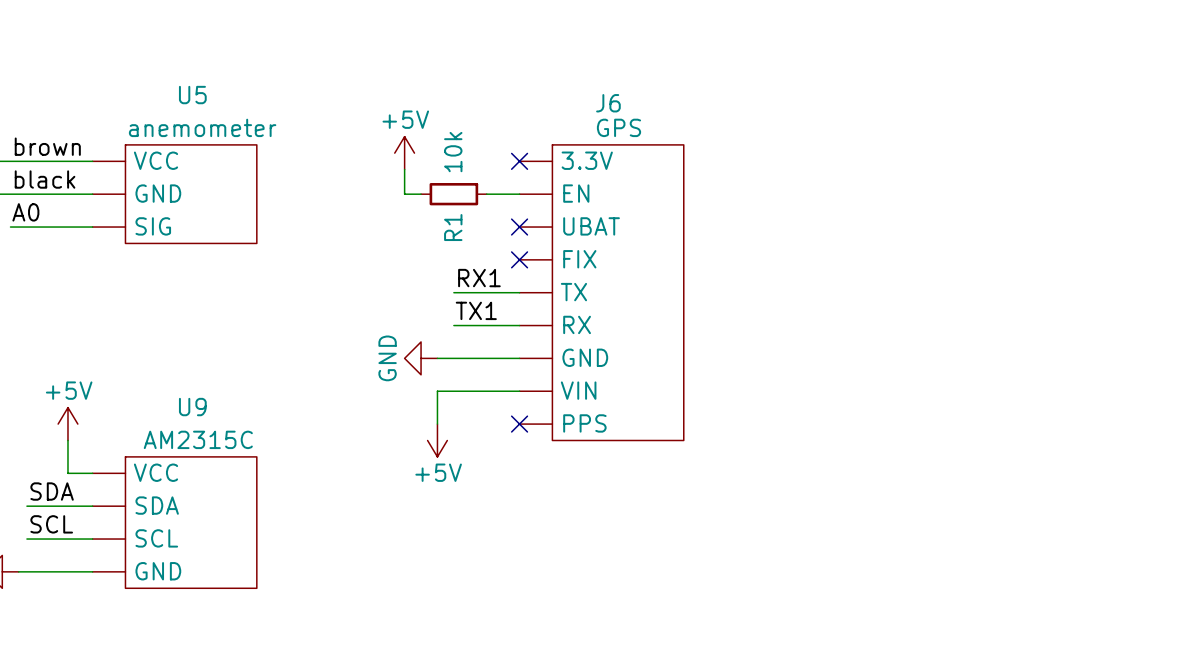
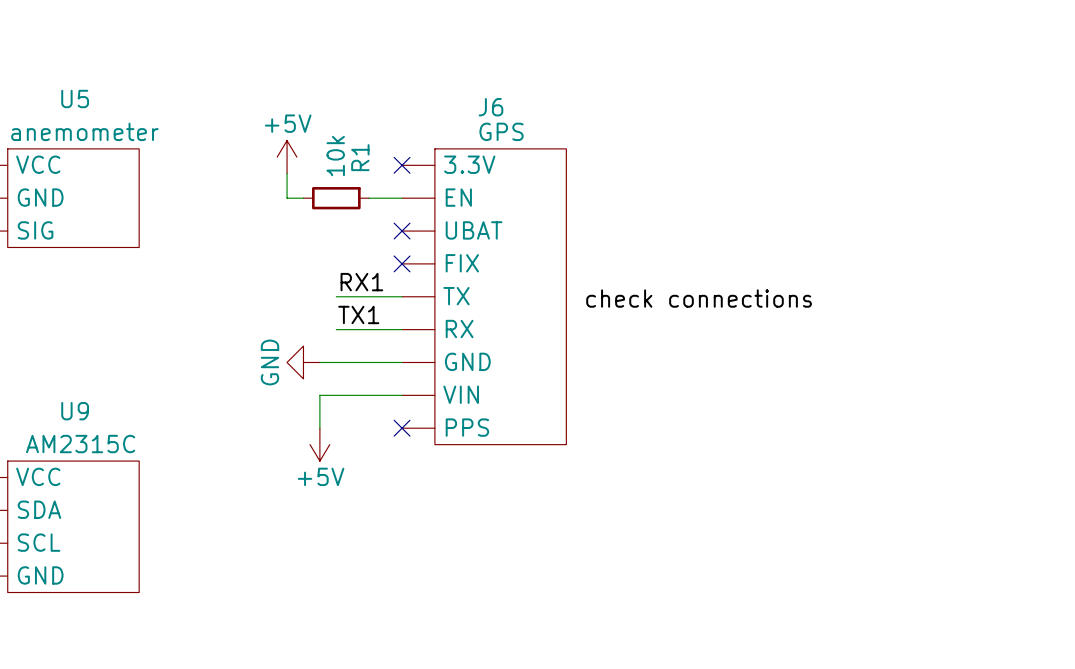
R1 name position: R1 (453, 227) -> R1 (360, 157)
label: none -> check connections (699, 298)

